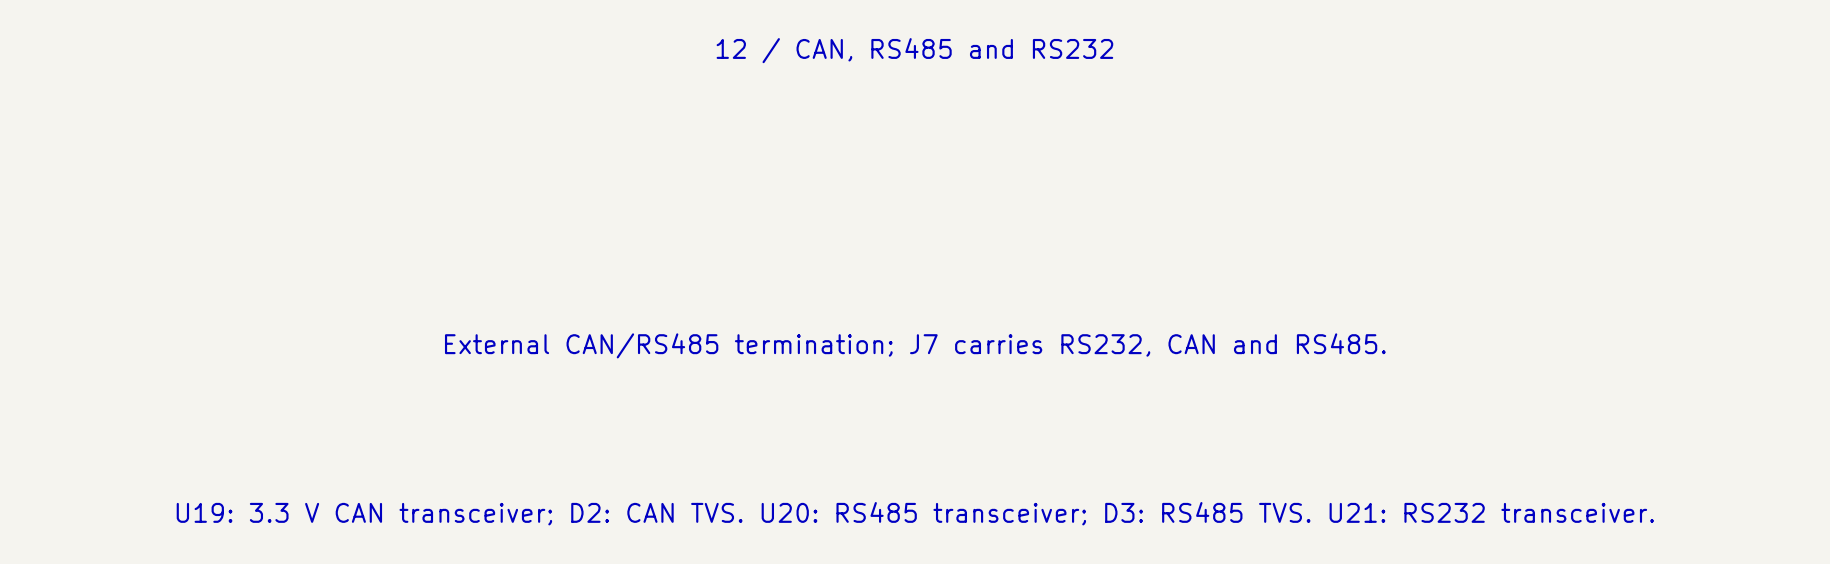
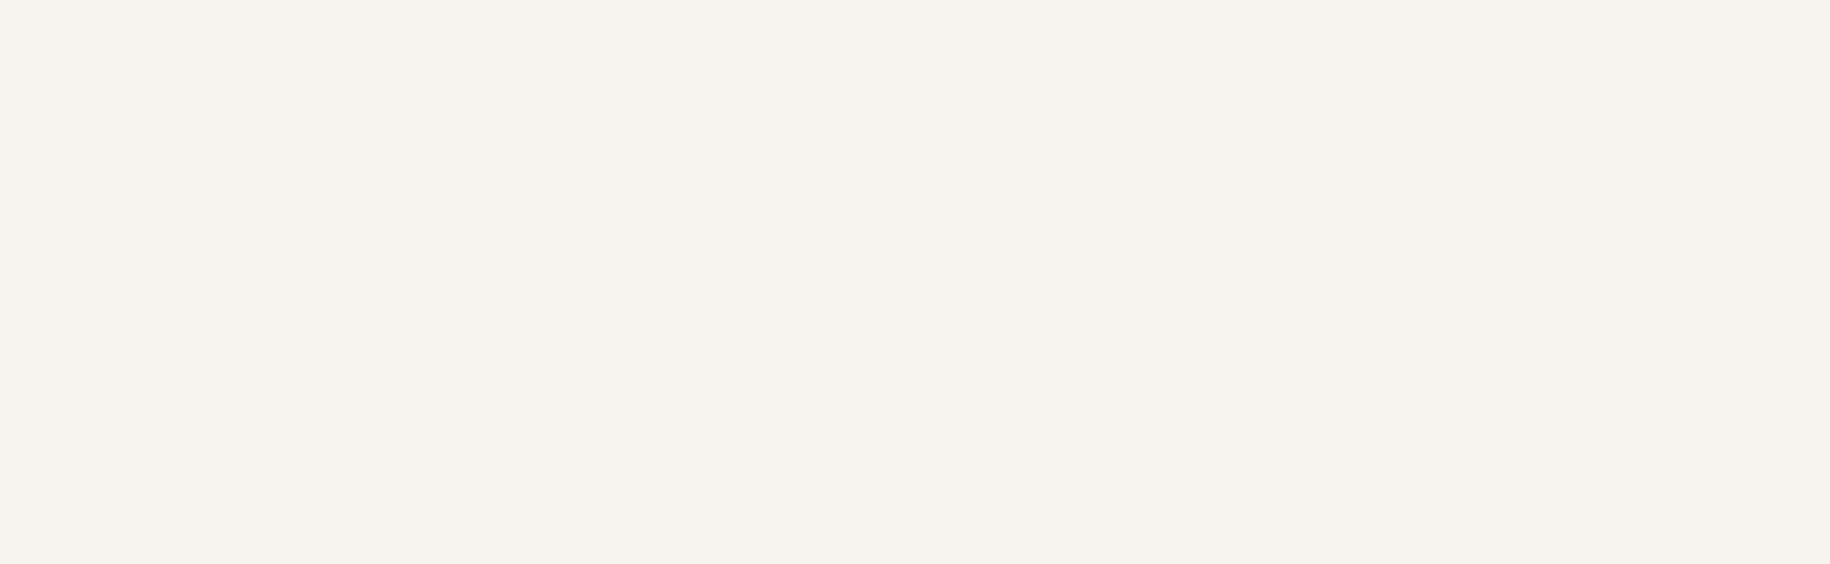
text: 12 / CAN, RS485 and RS232 (914, 50) -> none
text: External CAN/RS485 termination; J7 carries RS232, CAN and RS485. (915, 345) -> none
text: U19: 3.3 V CAN transceiver; D2: CAN TVS. U20: RS485 transceiver; D3: RS485 TVS. U21: RS232 transceiver. (915, 513) -> none

